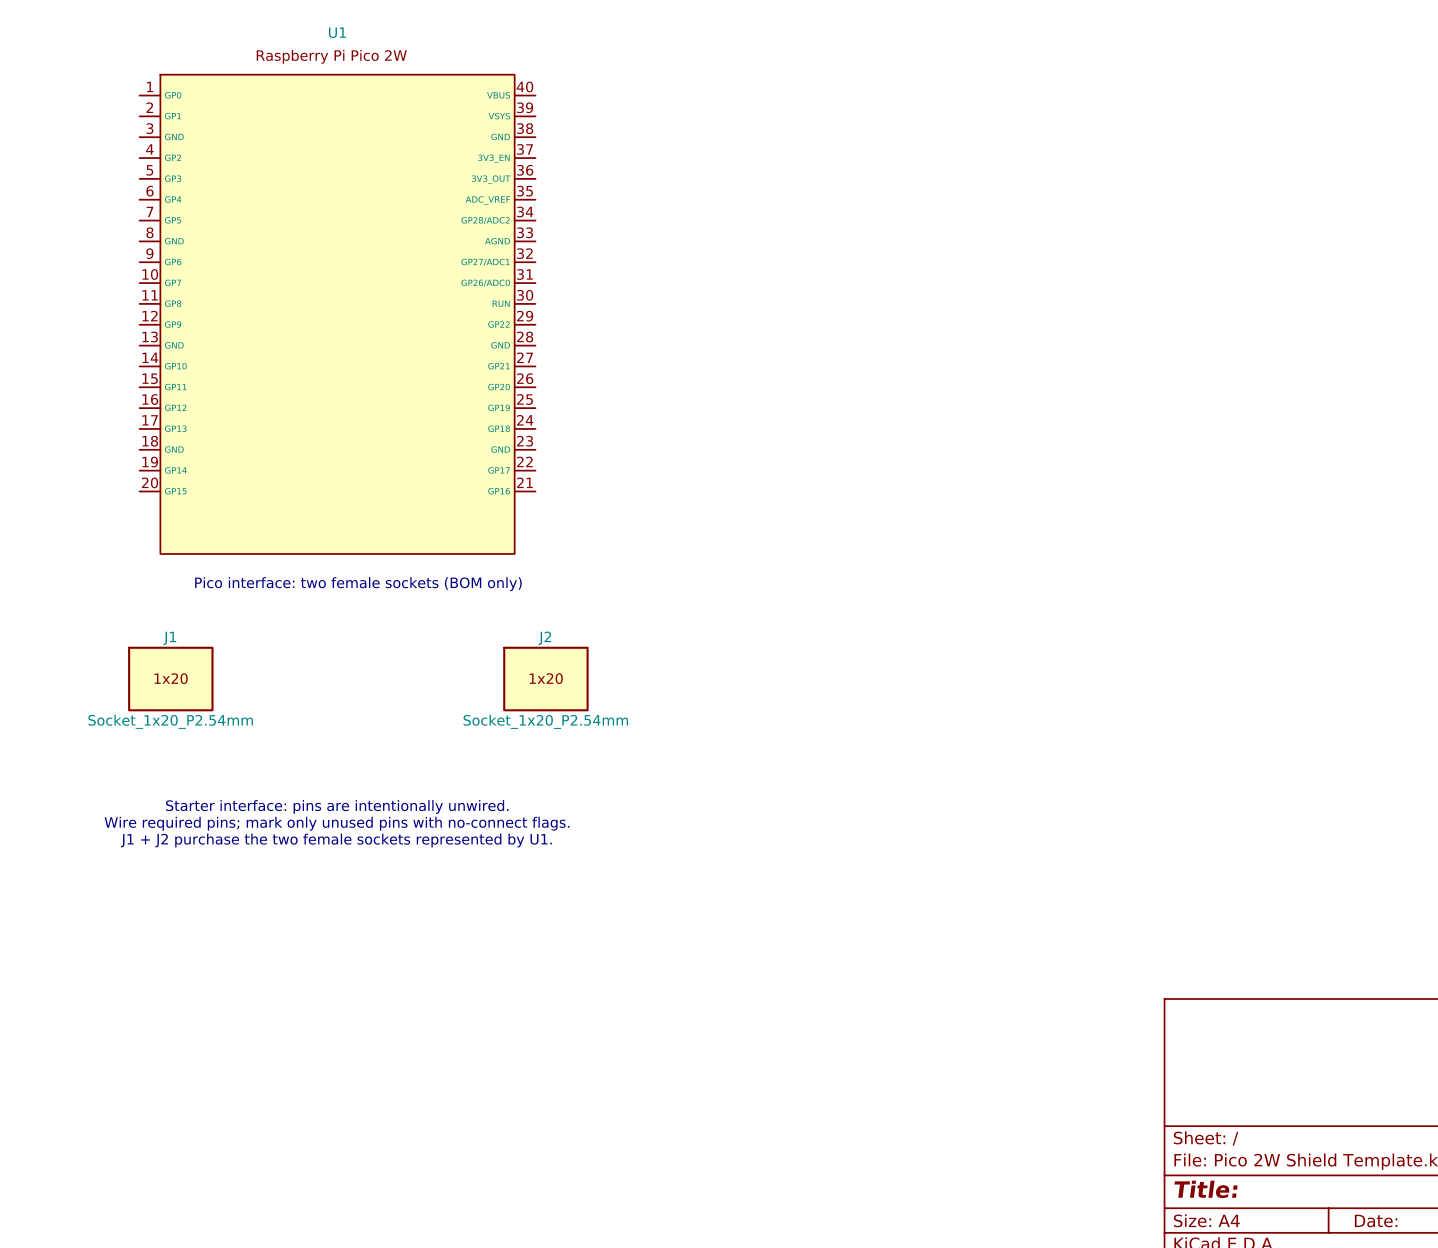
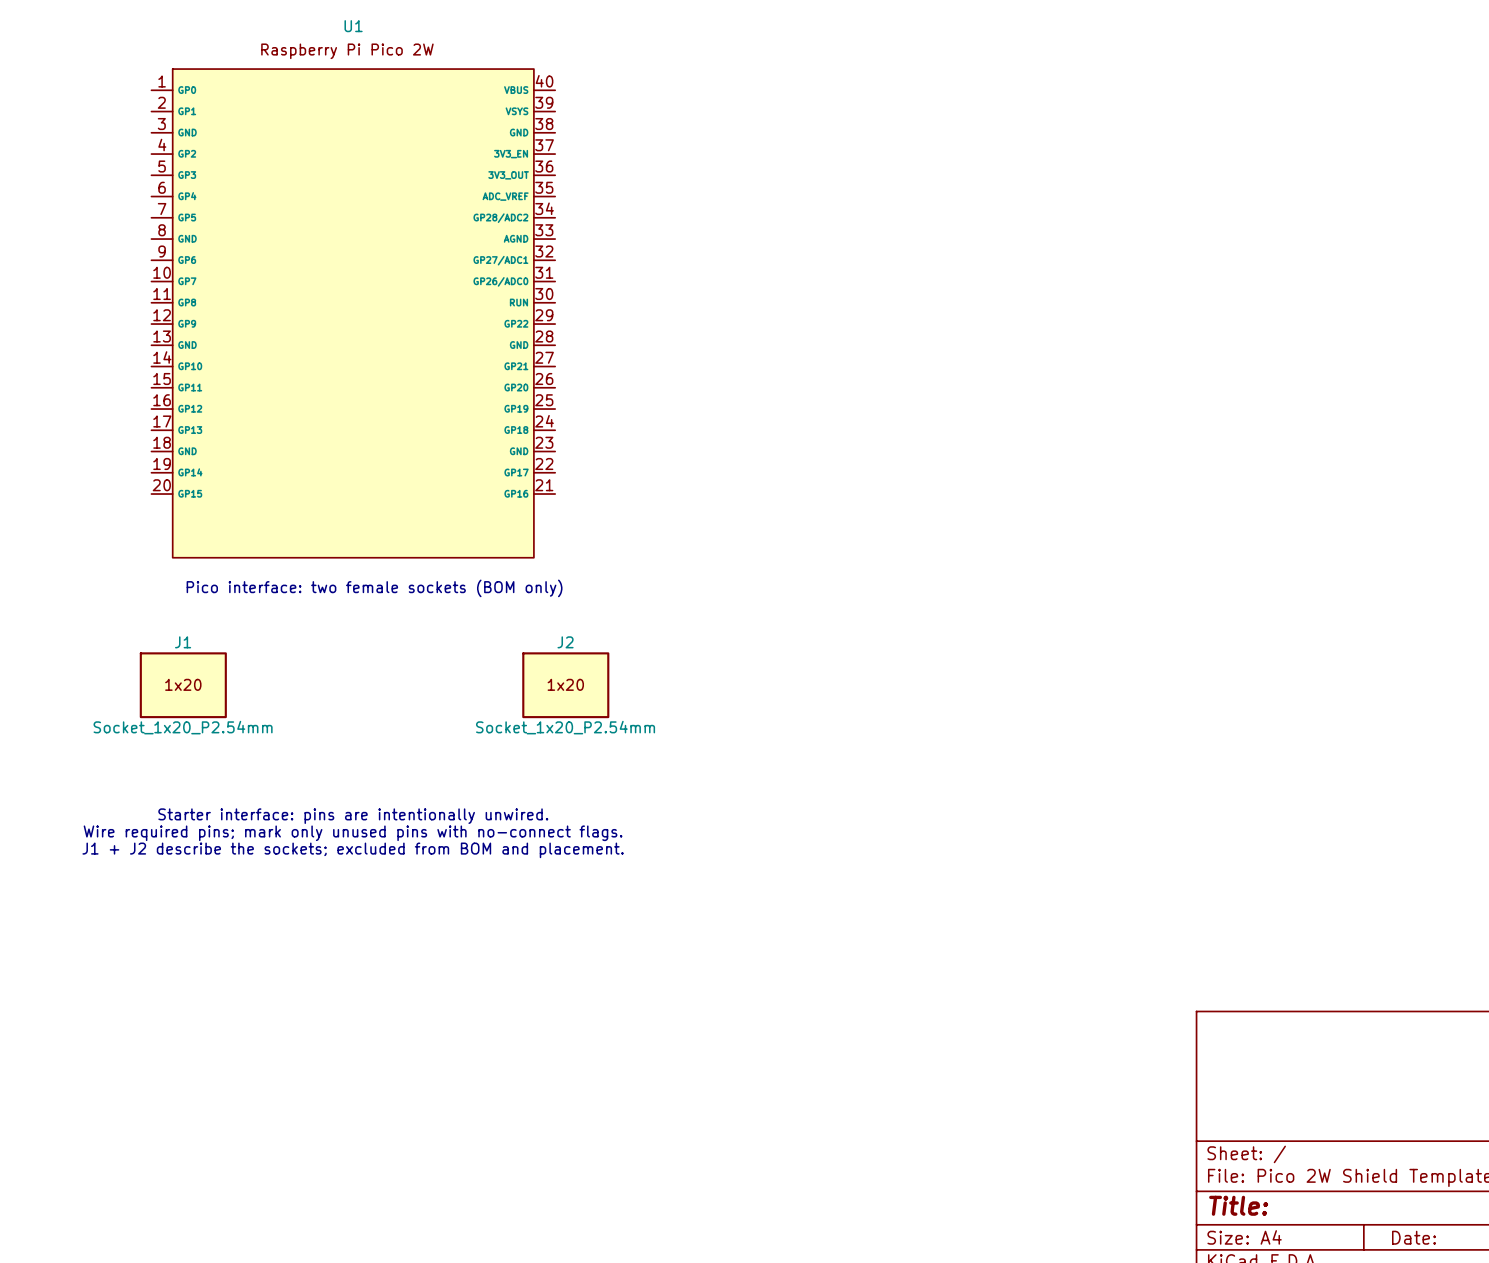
text: J1 + J2 purchase the two female sockets represented by U1. (336, 840) -> J1 + J2 describe the sockets; excluded from BOM and placement. (353, 850)

